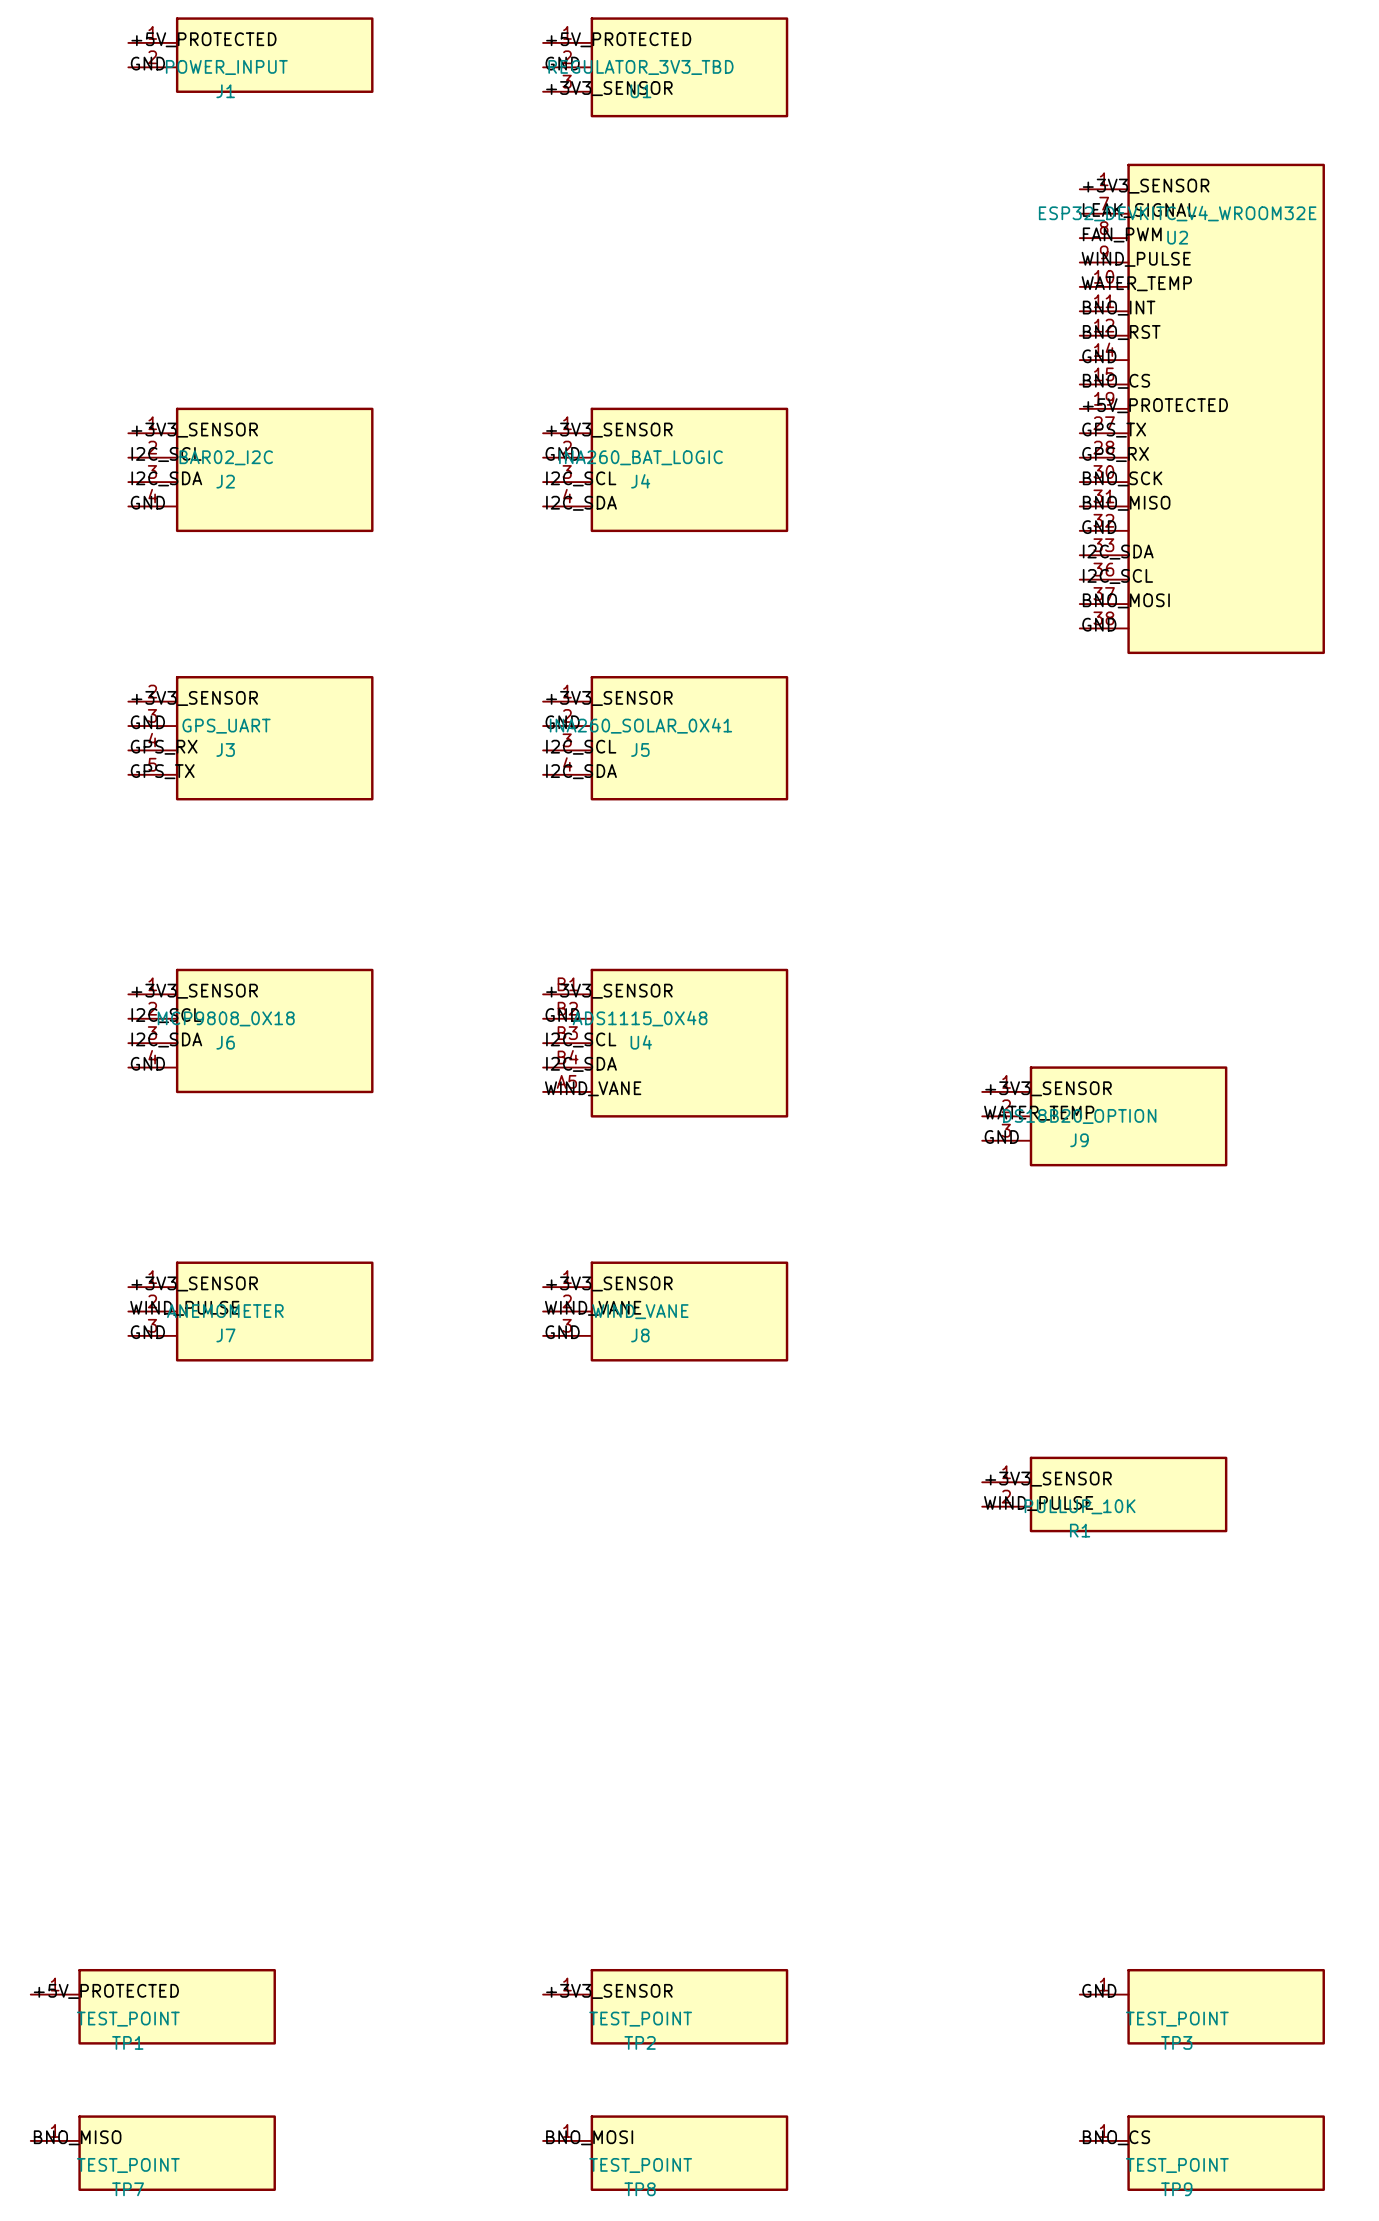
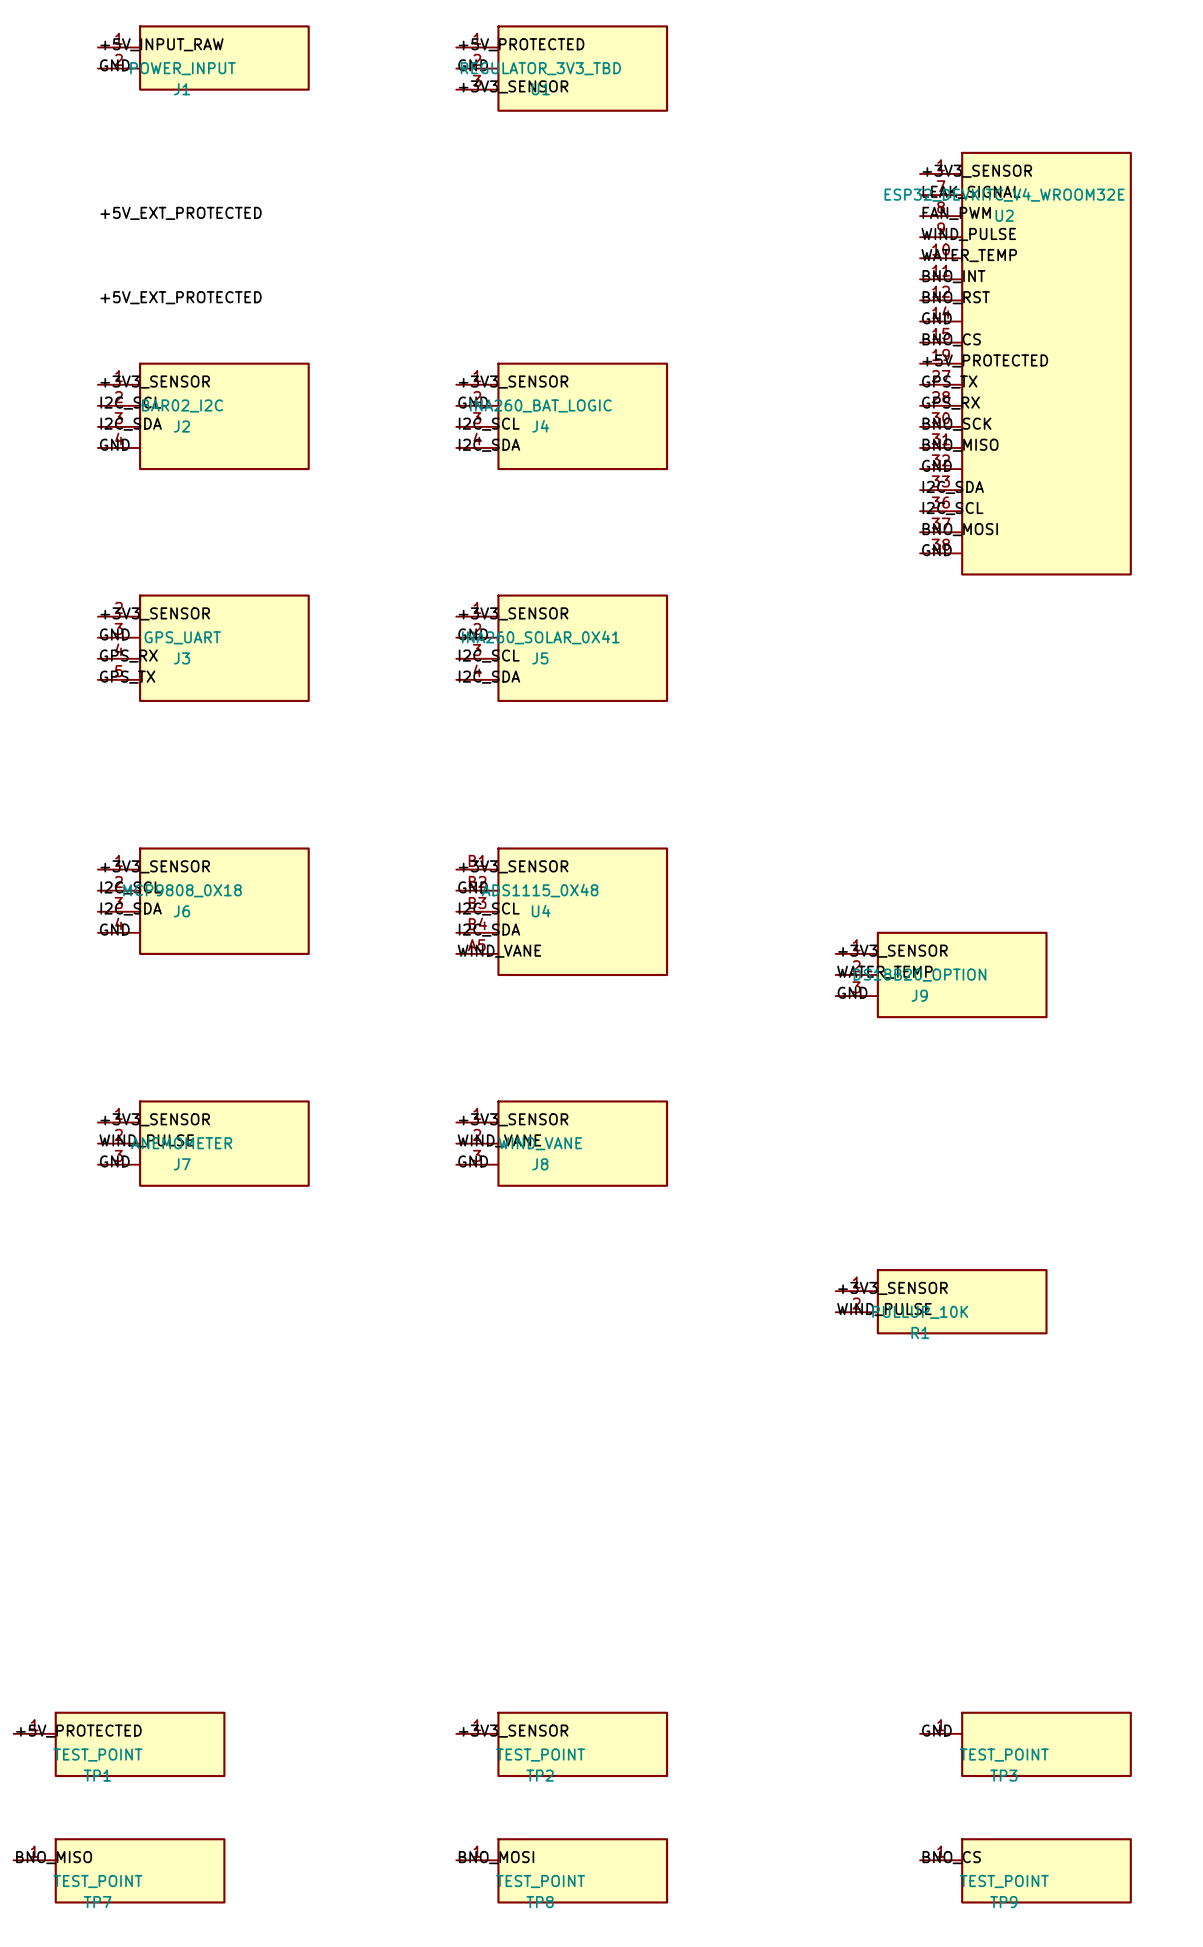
label: +5V_PROTECTED (203, 39) -> +5V_INPUT_RAW (161, 44)
label: none -> +5V_EXT_PROTECTED (181, 213)
label: none -> +5V_EXT_PROTECTED (181, 297)

